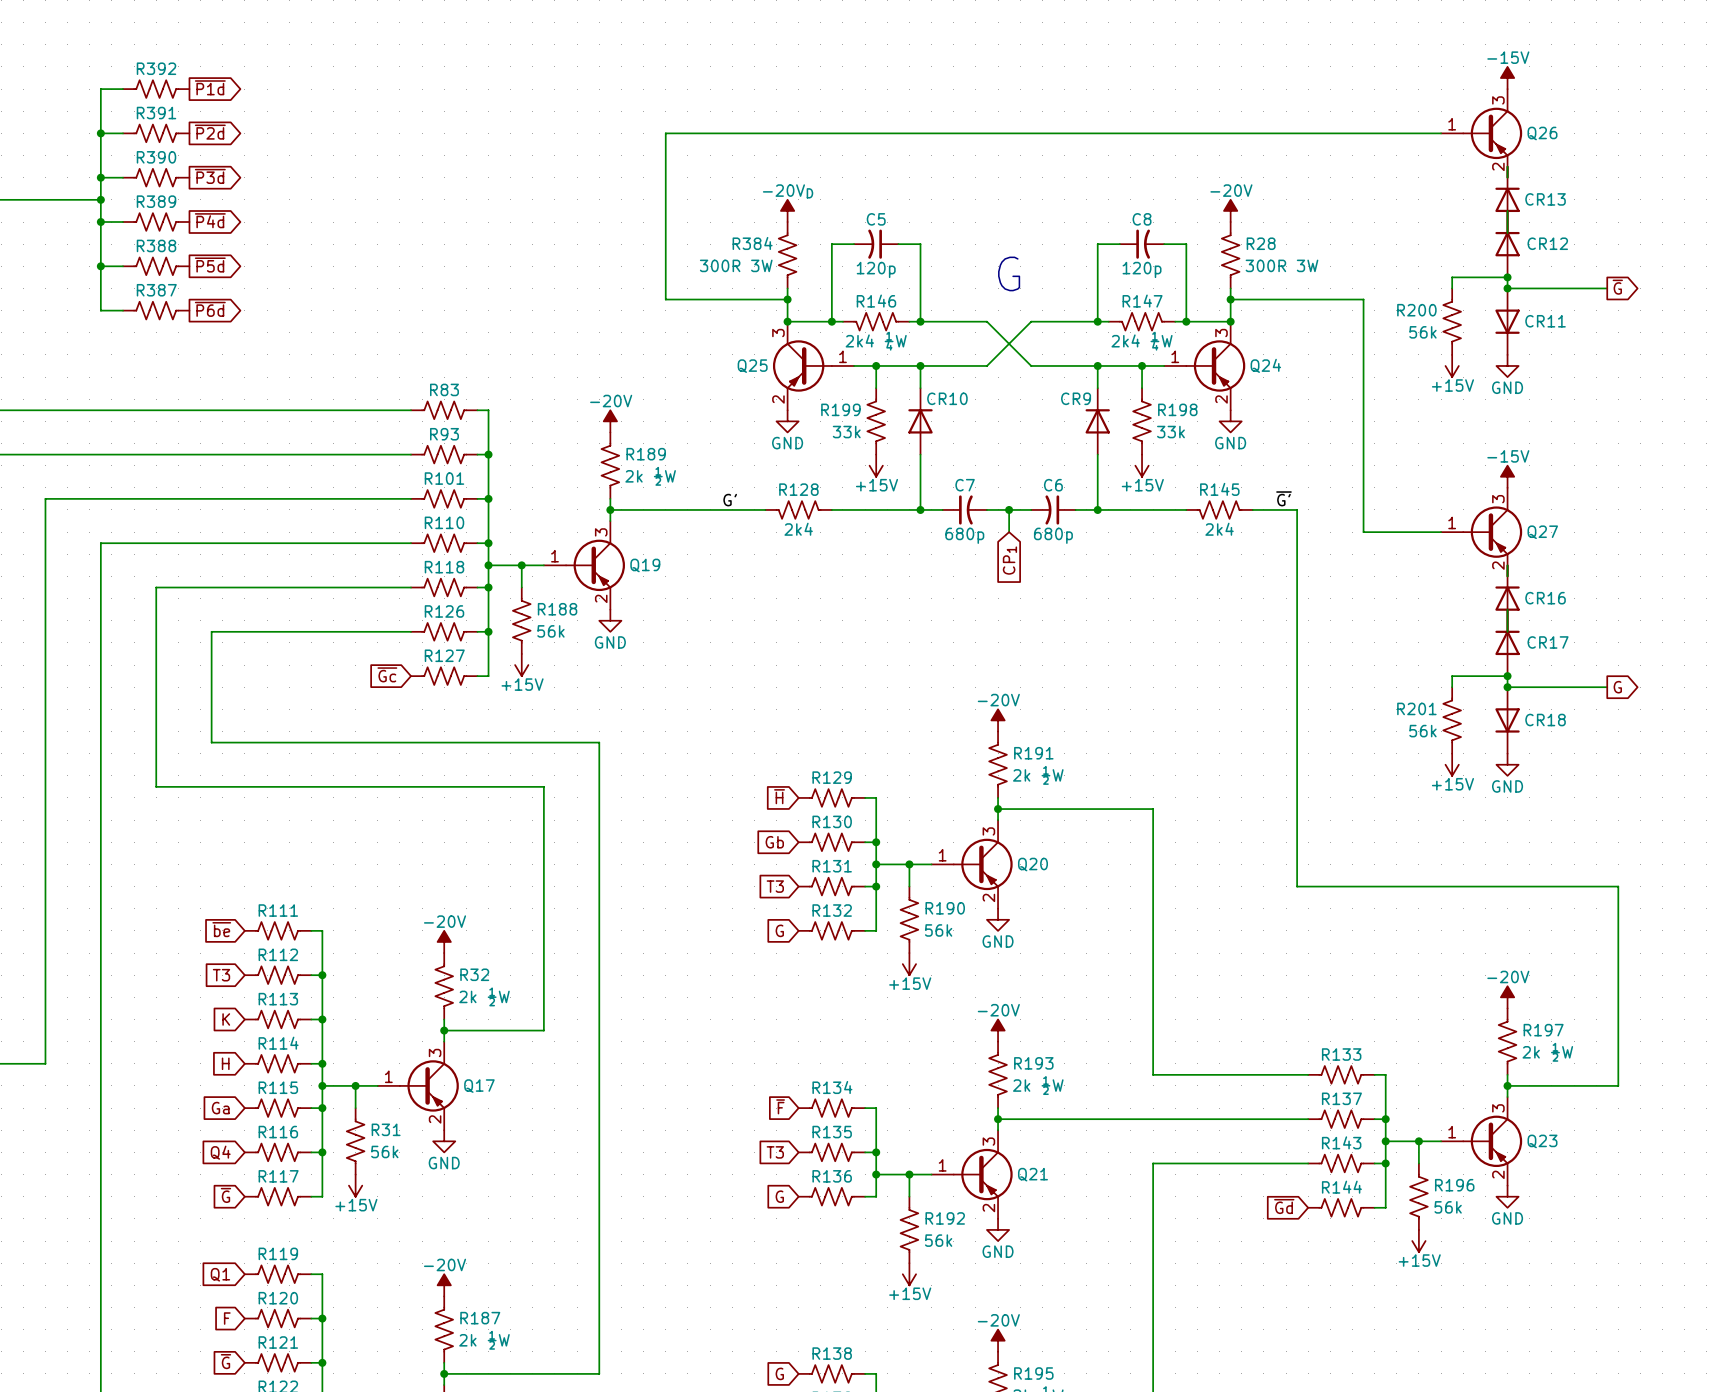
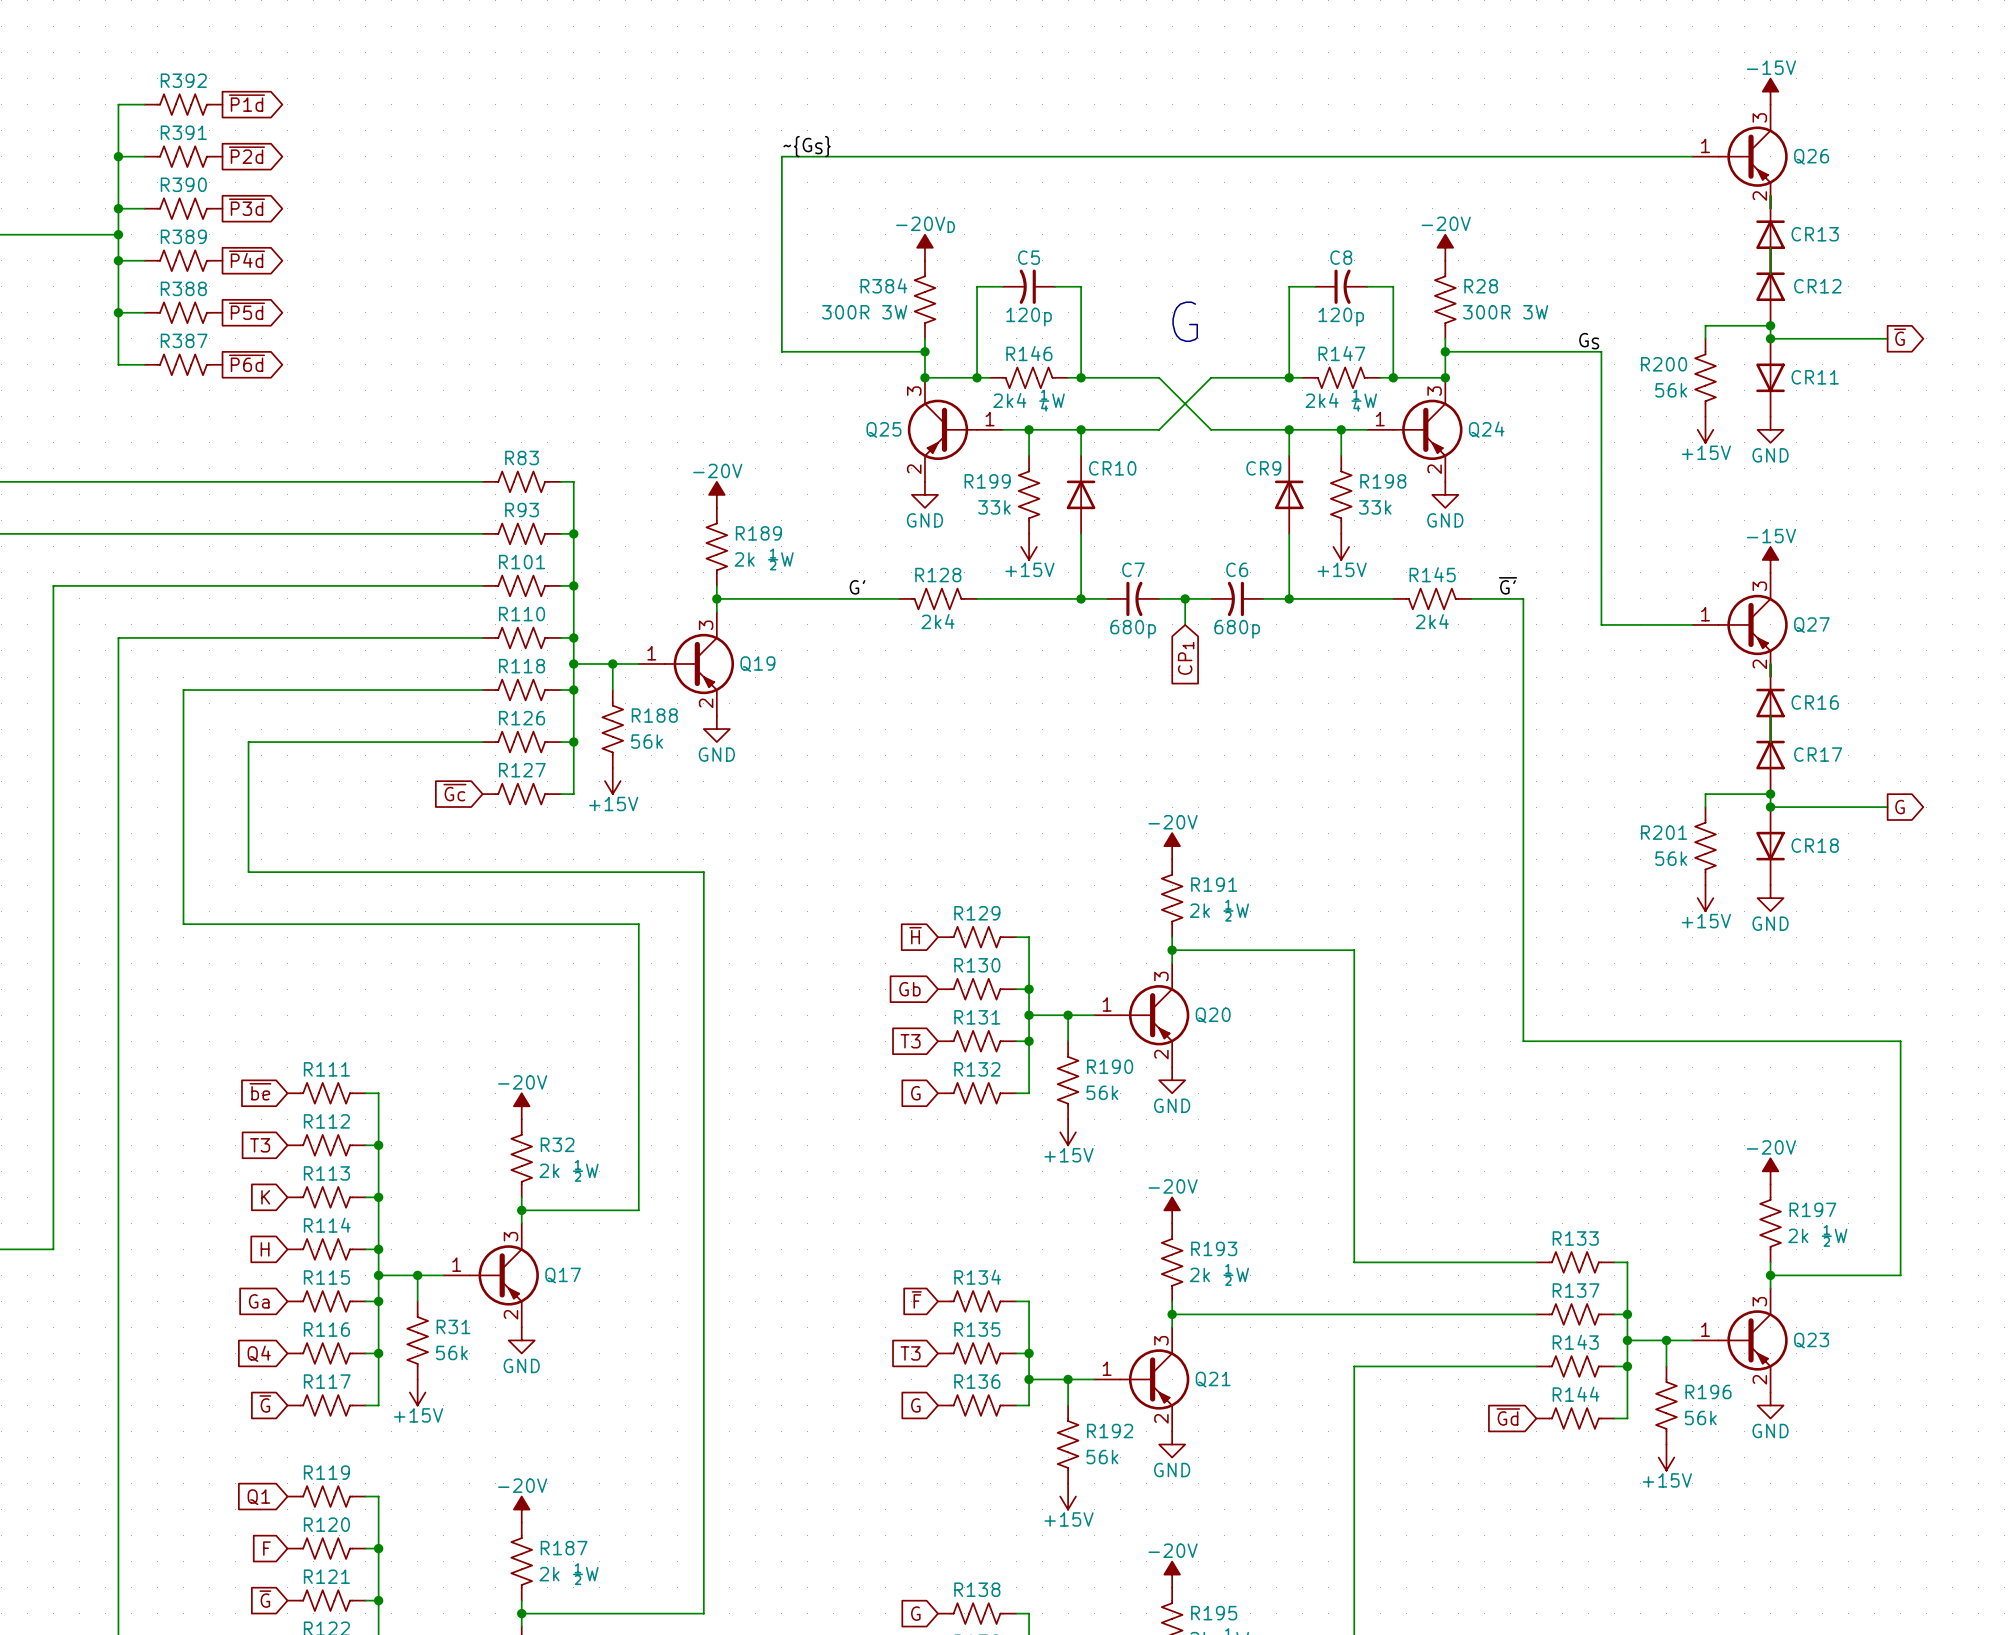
label: none -> ~{GS} (807, 146)
label: none -> GS (1589, 341)

